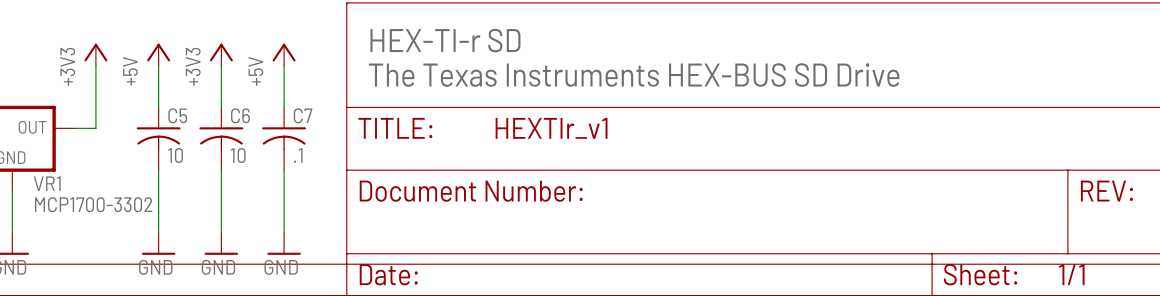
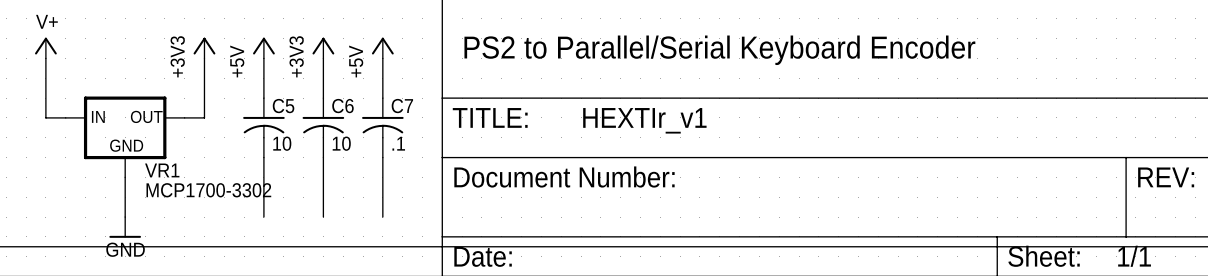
text: HEX-TI-r SD (445, 40) -> none
text: none -> PS2 to Parallel/Serial Keyboard Encoder (719, 50)
text: The Texas Instruments HEX-BUS SD Drive (634, 75) -> none
power symbol: GND (158, 243) -> none
power symbol: GND (221, 243) -> none
power symbol: GND (284, 243) -> none

